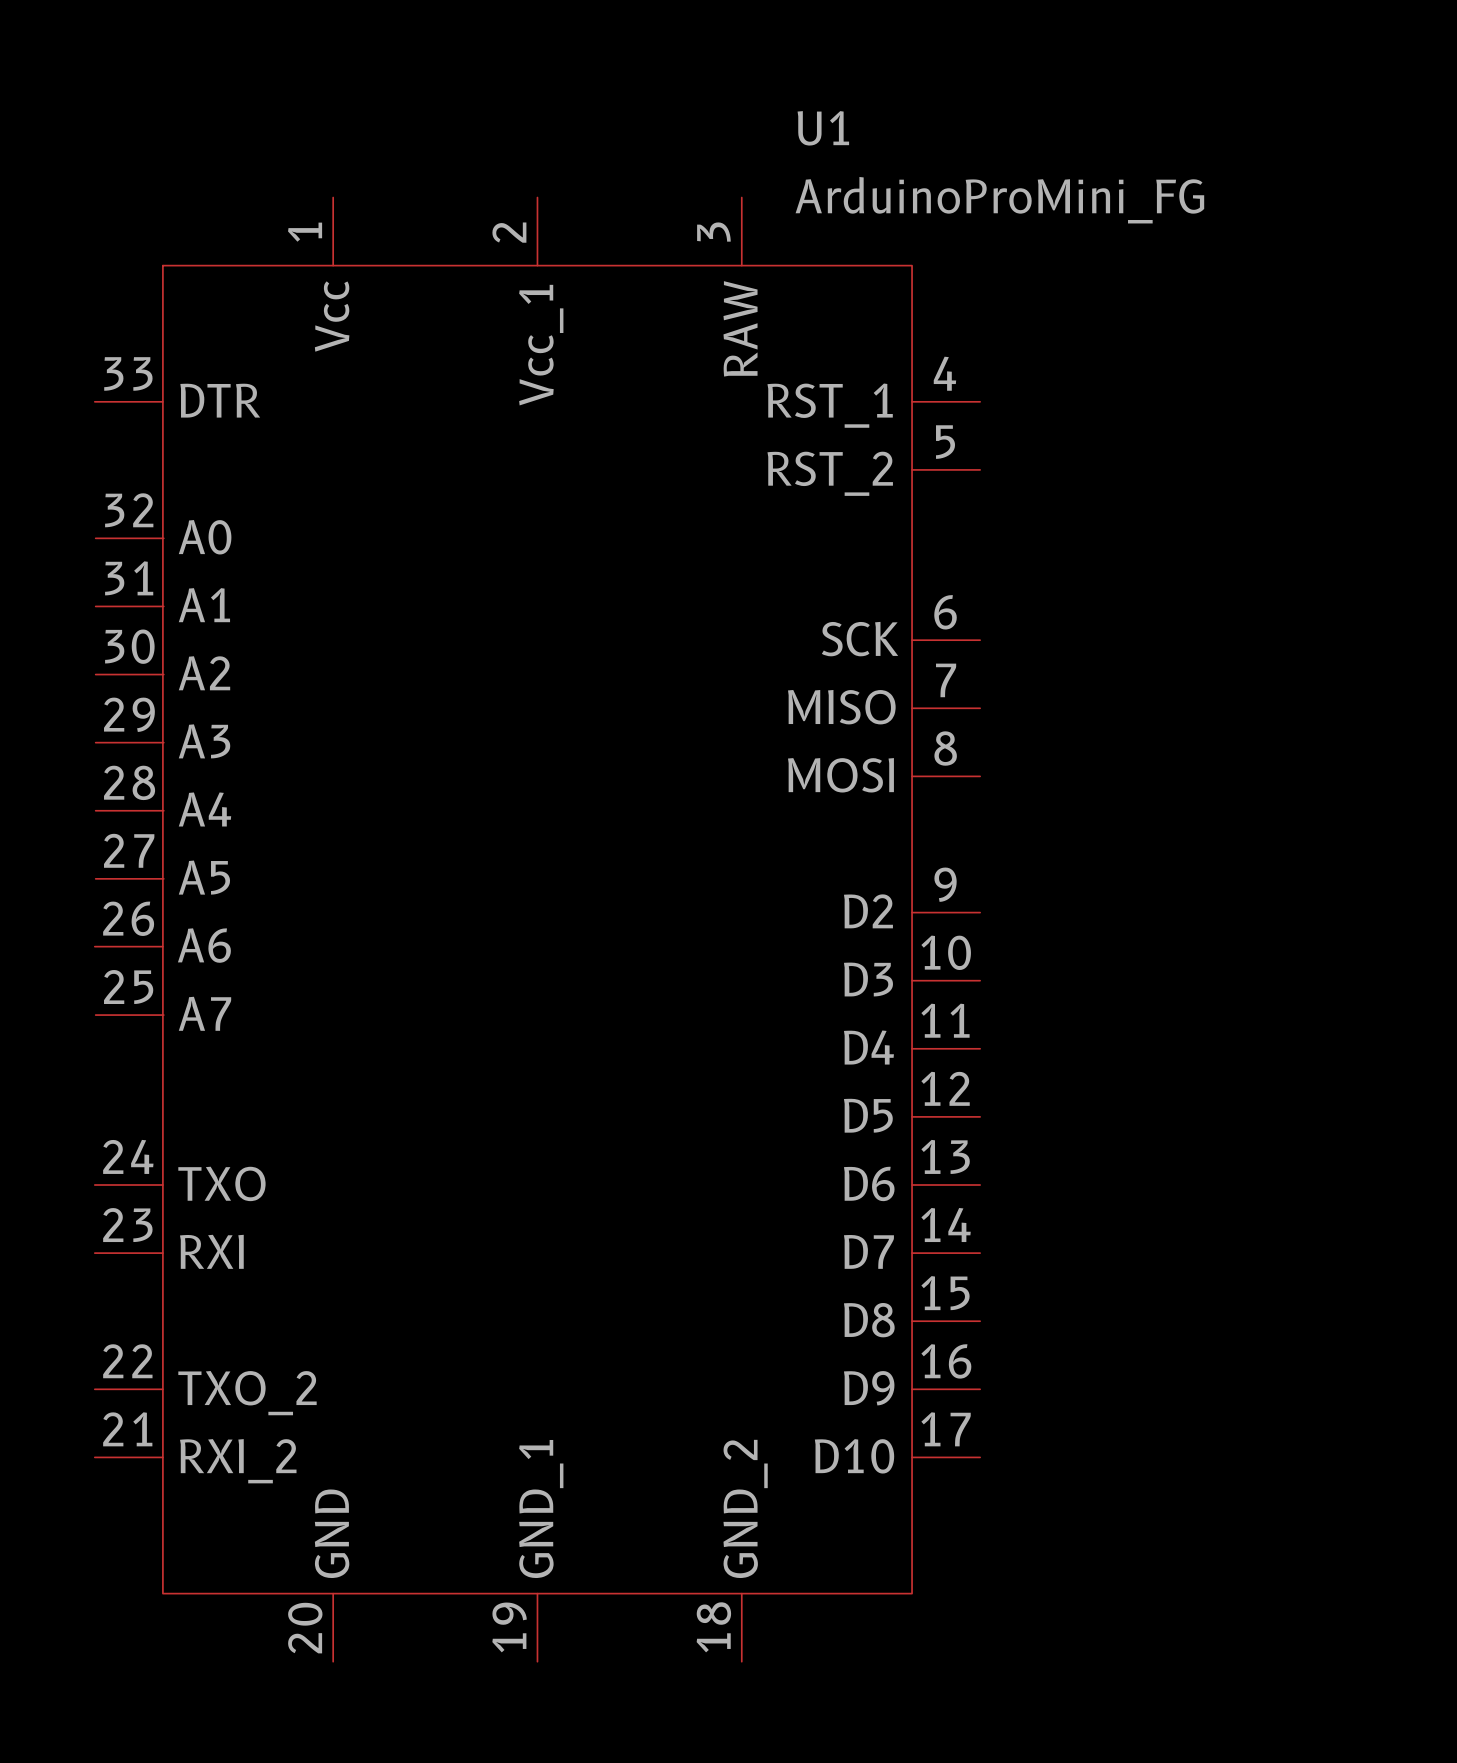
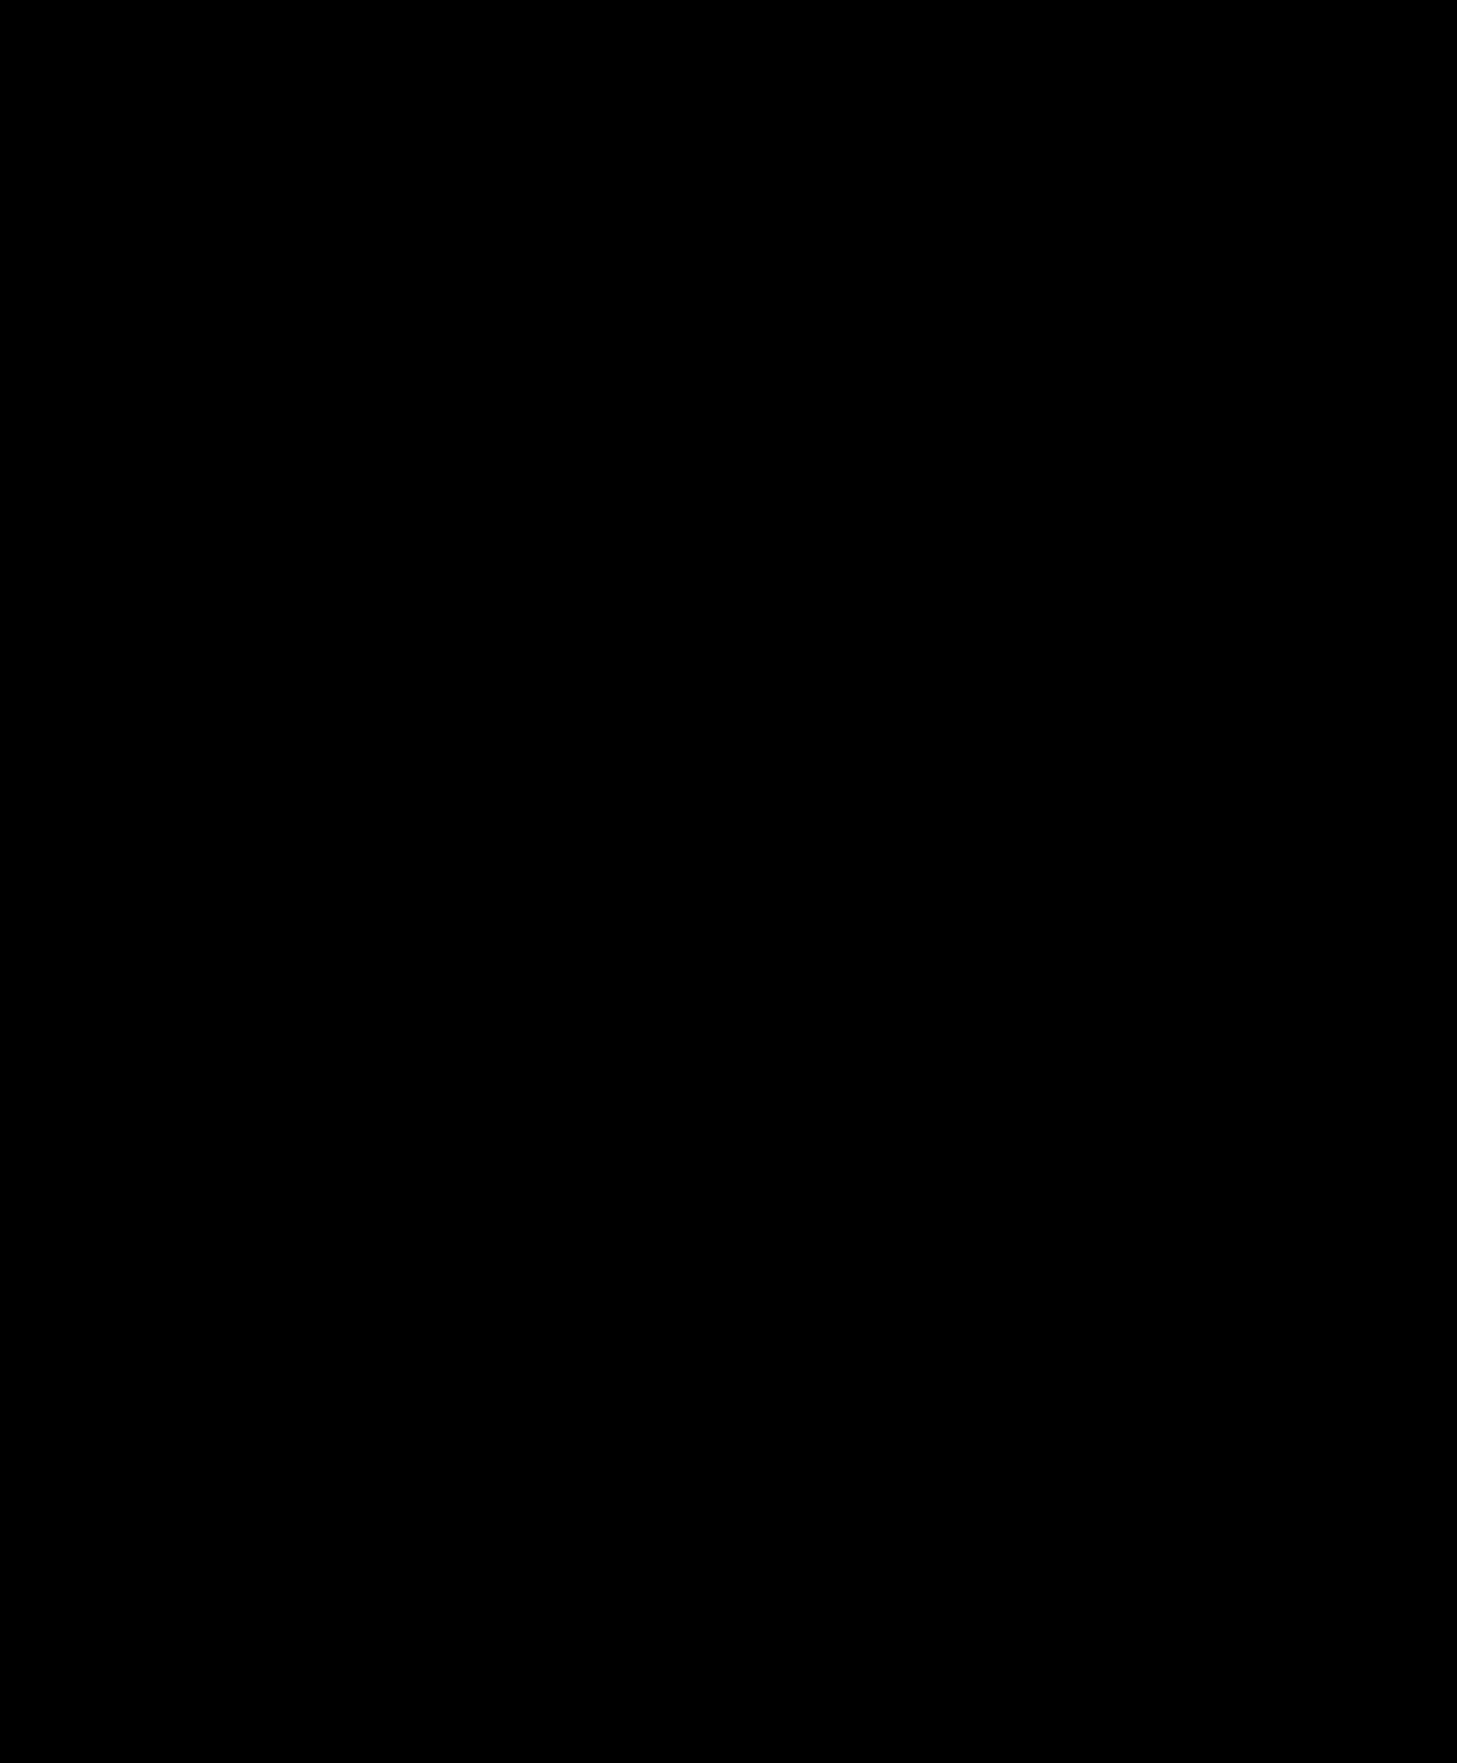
U1: ArduinoProMini_FG (537, 929) -> none

